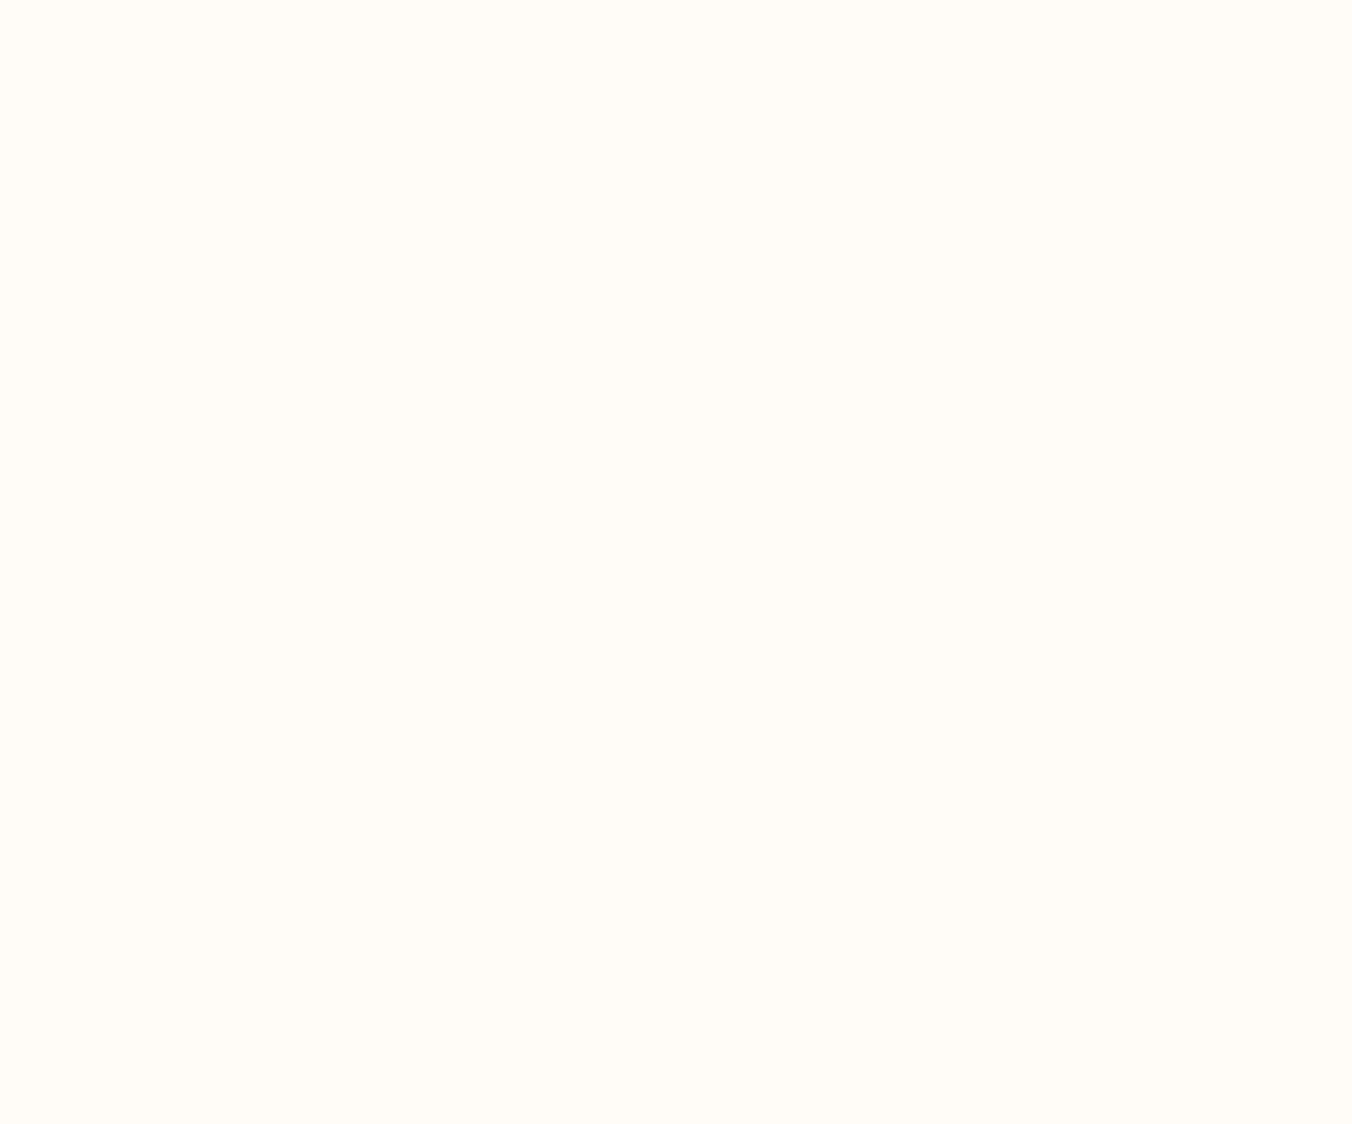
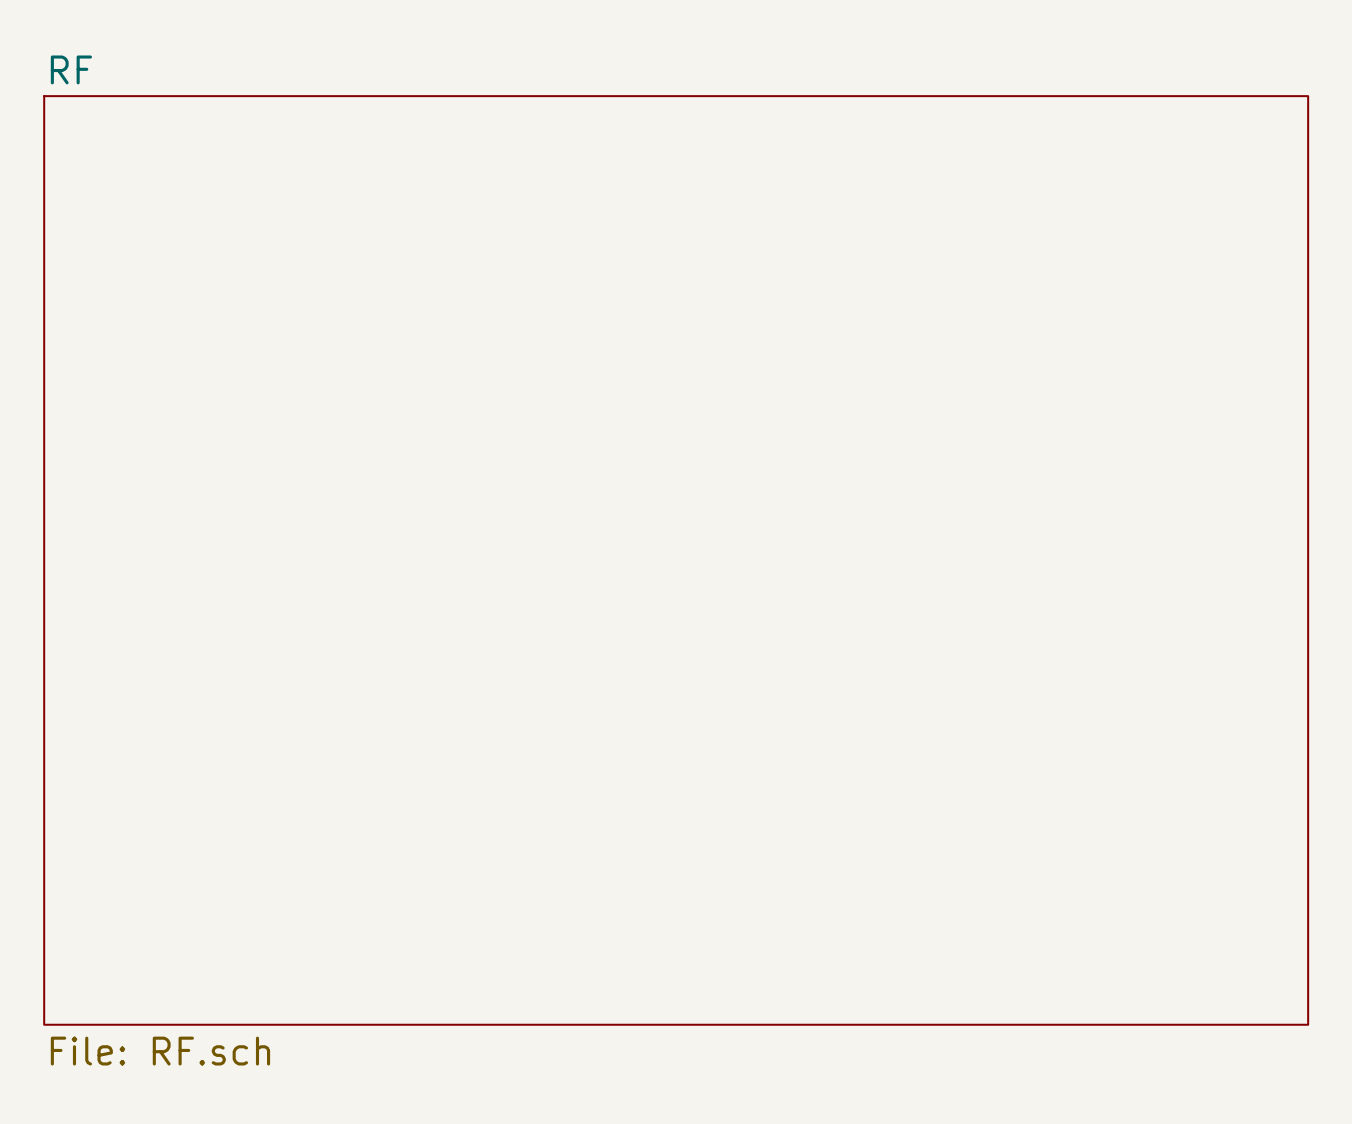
sheet RF: none -> File: RF.sch (676, 560)

